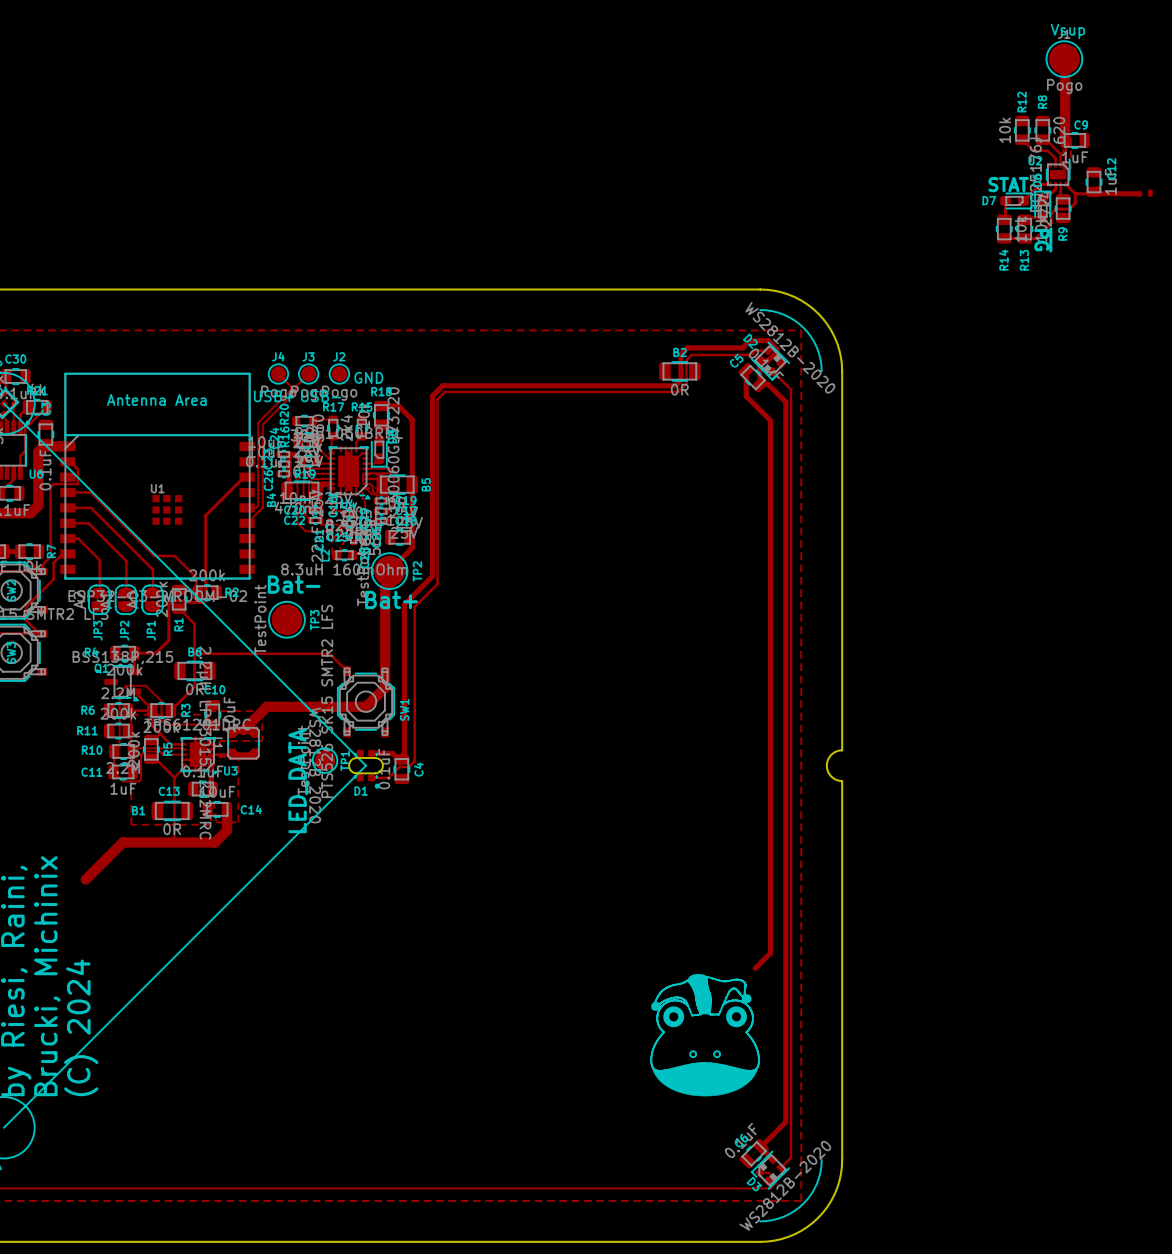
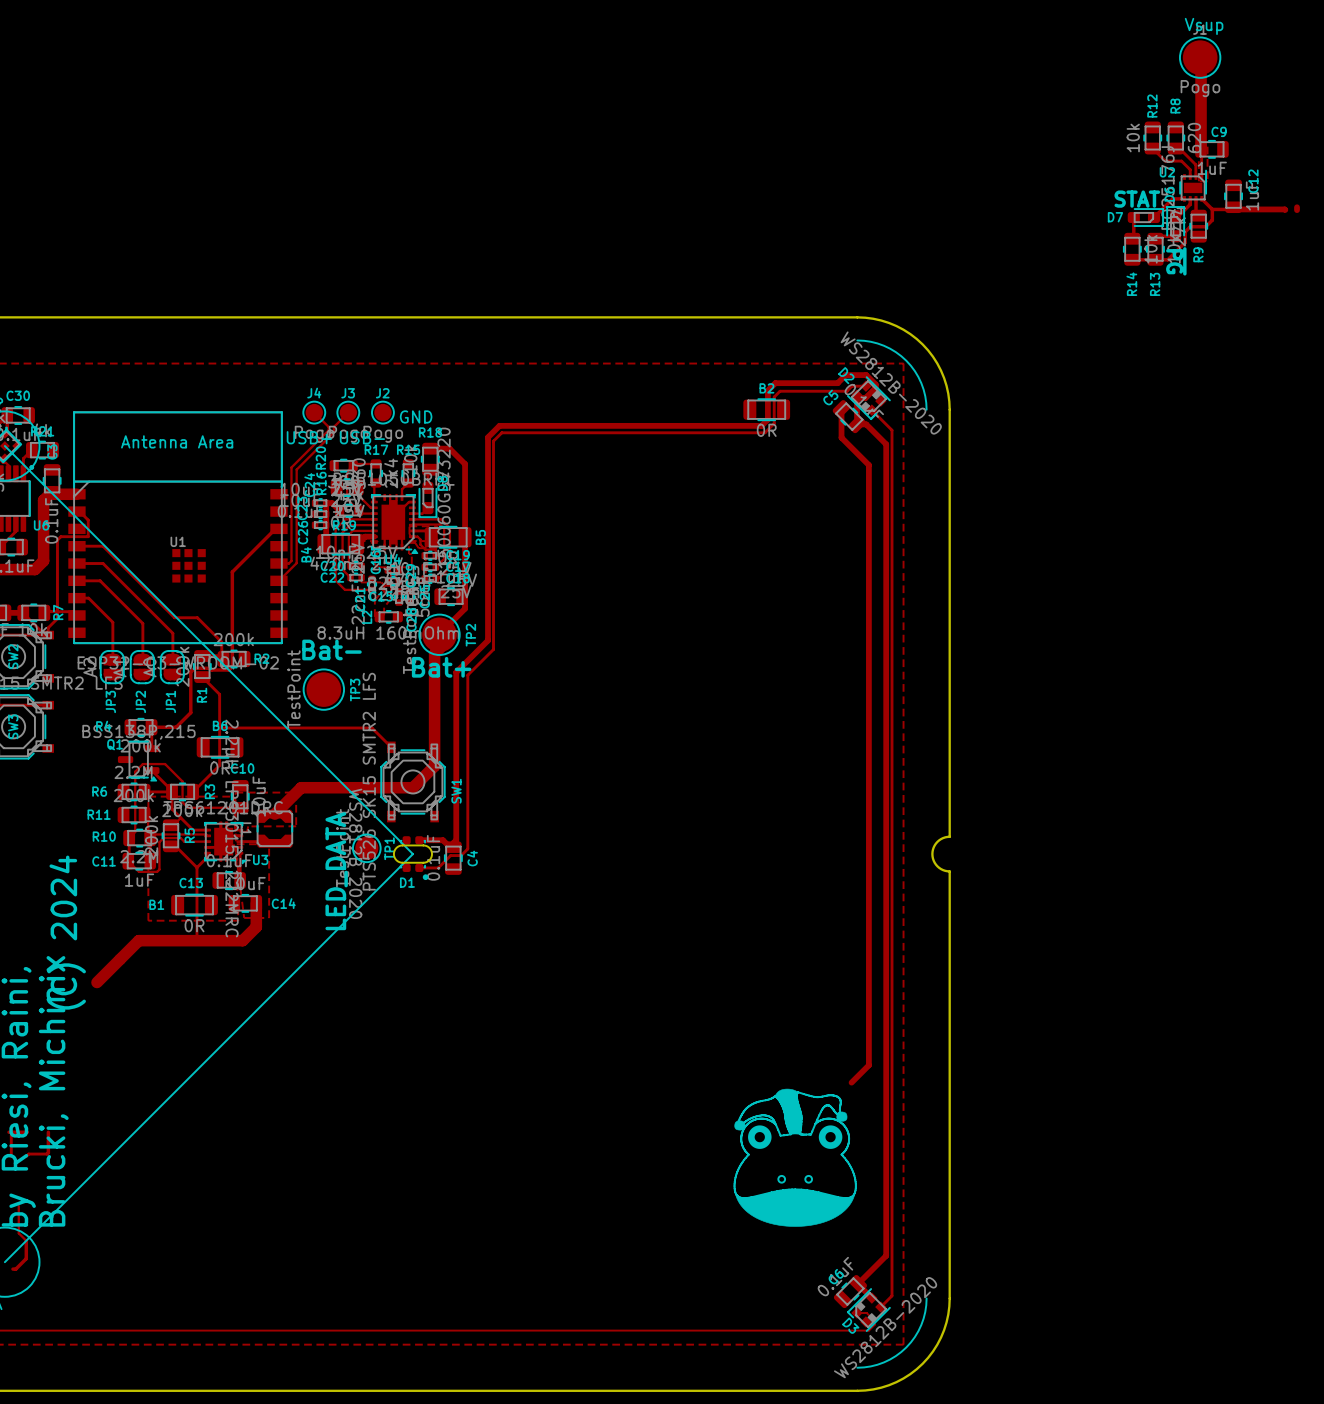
top track: (13, 402) (13, 428) -> none
top track: (46, 407) (25, 428) (25, 451) (20, 455) (20, 472) -> none
top track: (67, 553) (62, 553) (53, 562) (53, 579) (26, 606) (26, 620) (39, 633) -> (76, 615) (73, 611) (50, 611)
top track: none -> (8, 1132) (27, 1132)
top track: none -> (48, 1132) (48, 1152) (28, 1154) (26, 1156)
top track: none -> (12, 1134) (11, 1156)
text position: (C) 2024 (81, 1027) -> (C) 2024 (66, 932)
top track: none -> (18, 1206) (18, 1233) (26, 1240) (26, 1258) (15, 1269) (12, 1269)

